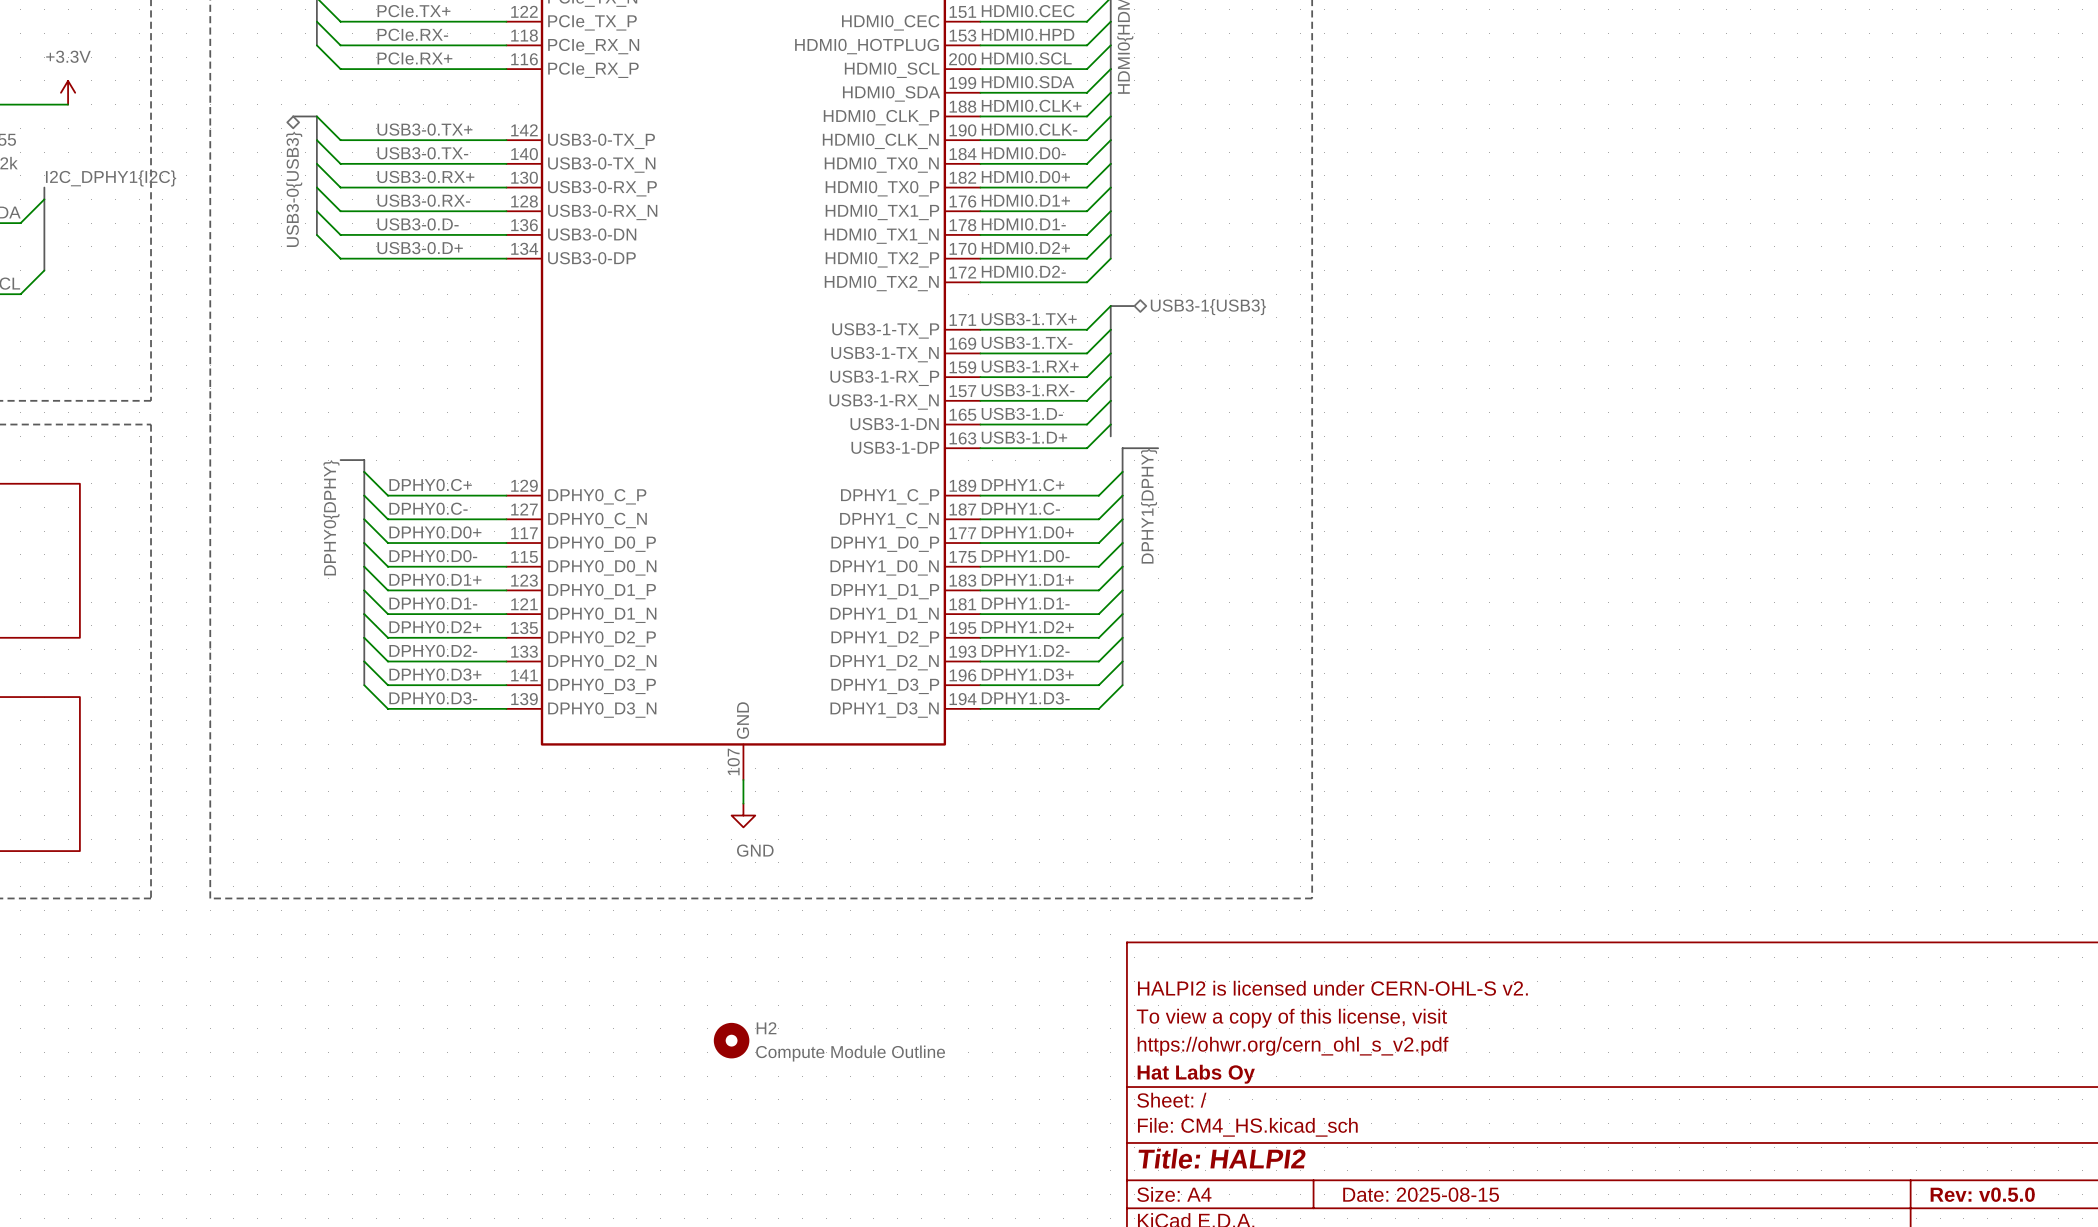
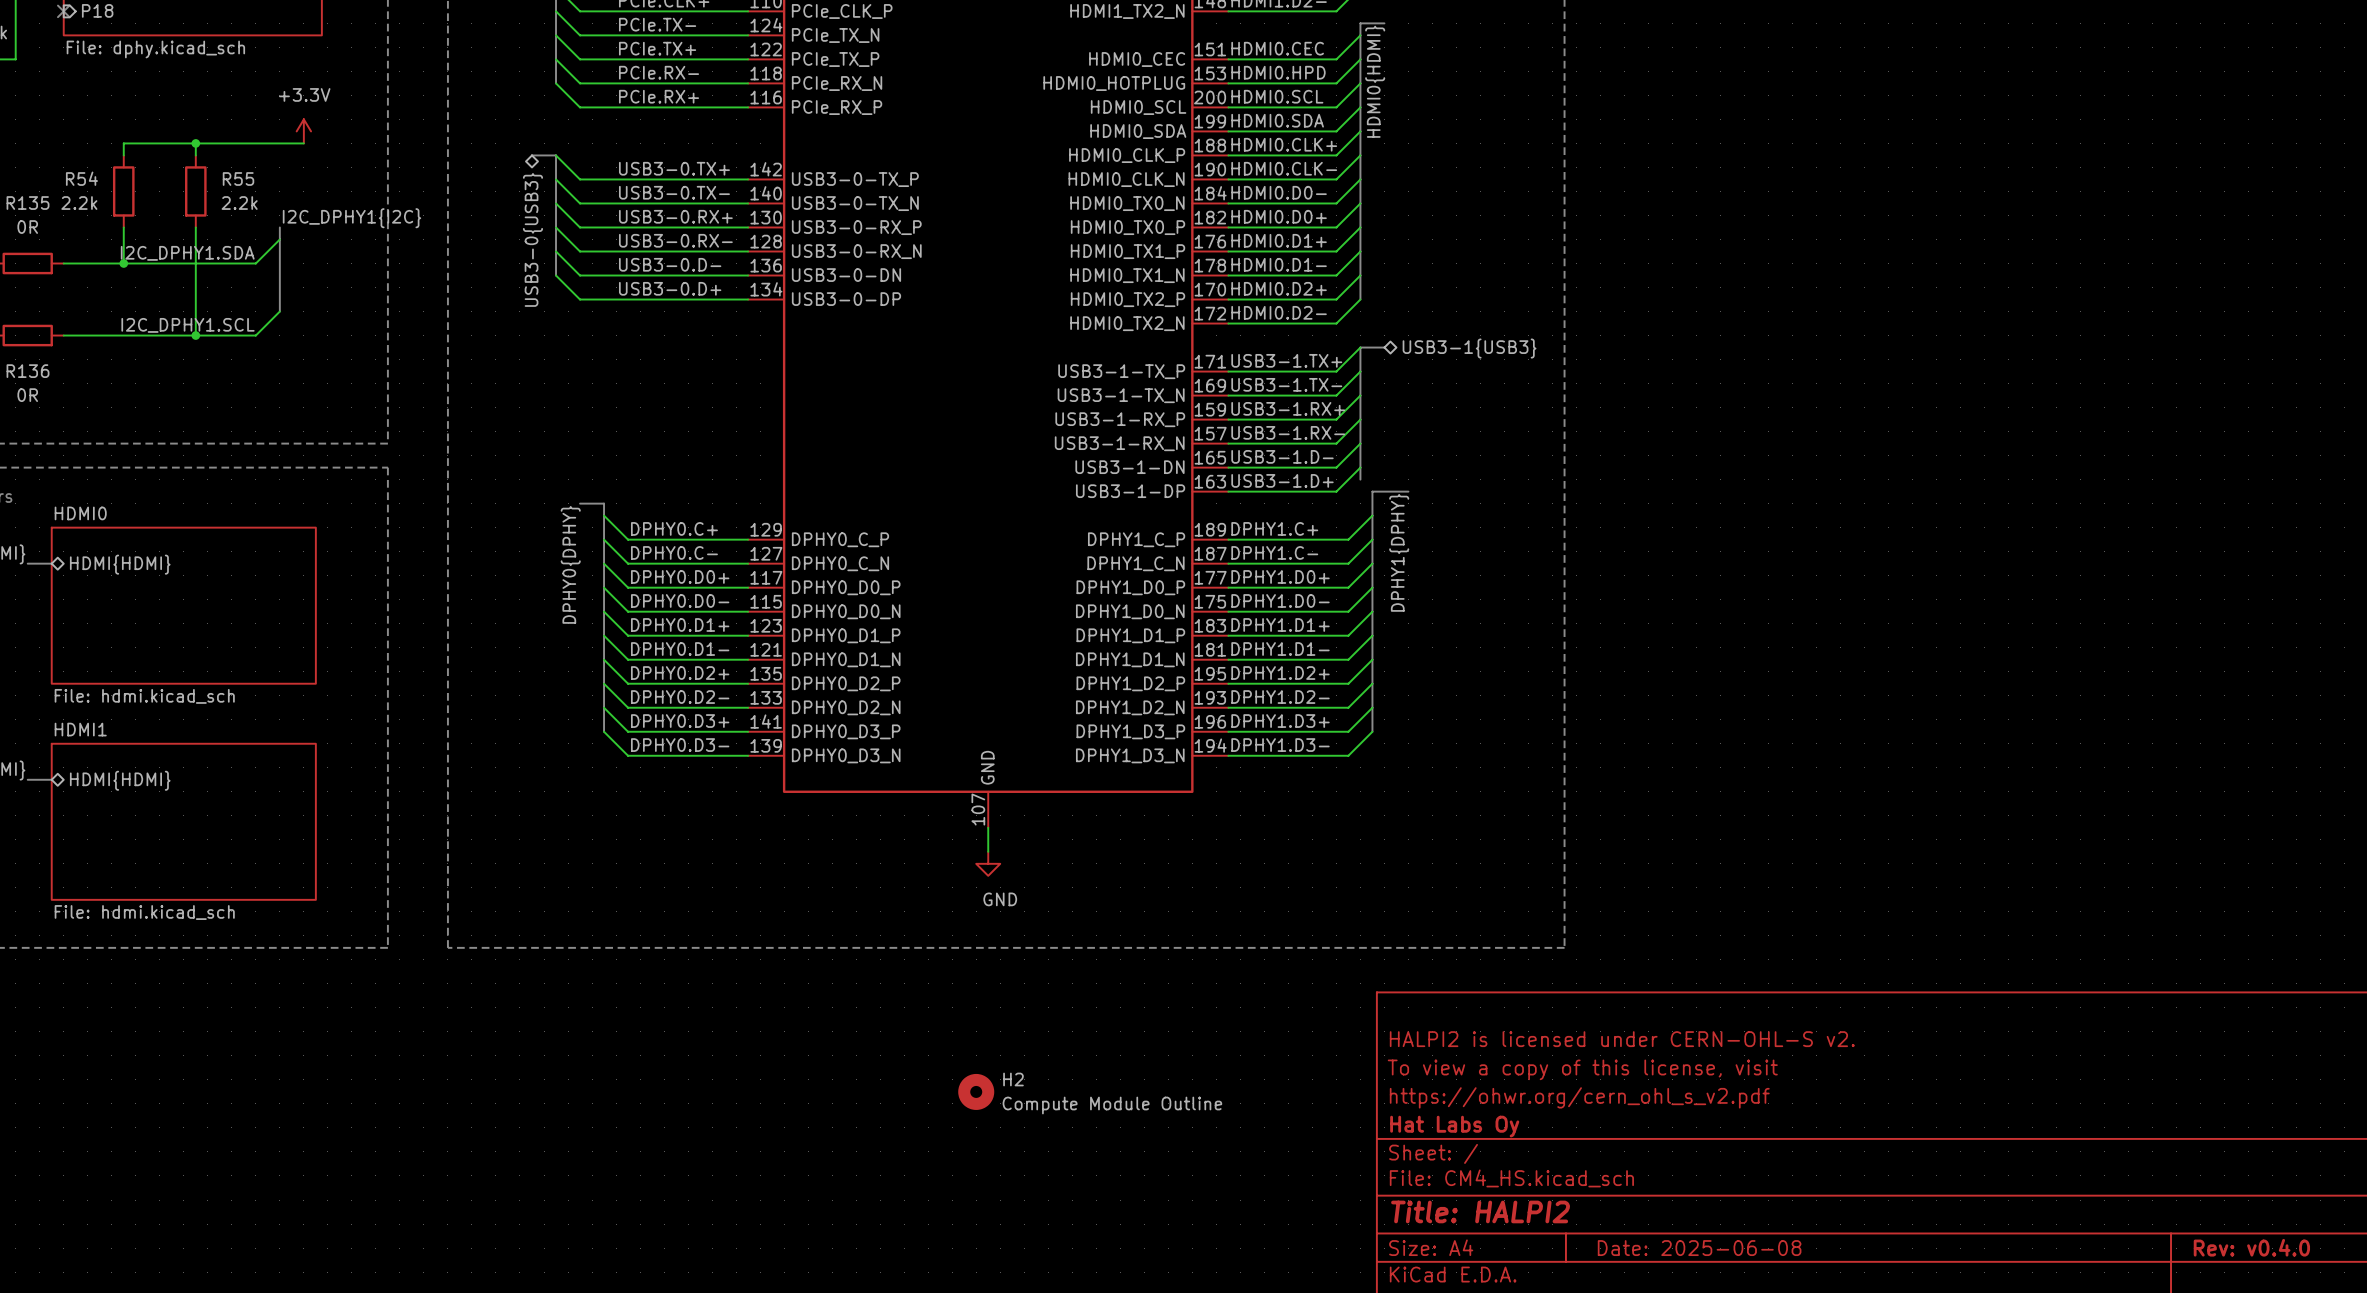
title block: Date: 2025-08-15 (1421, 1194) -> Date: 2025-06-08 (1699, 1248)
title block: Rev: v0.5.0 (1982, 1194) -> Rev: v0.4.0 (2251, 1247)

